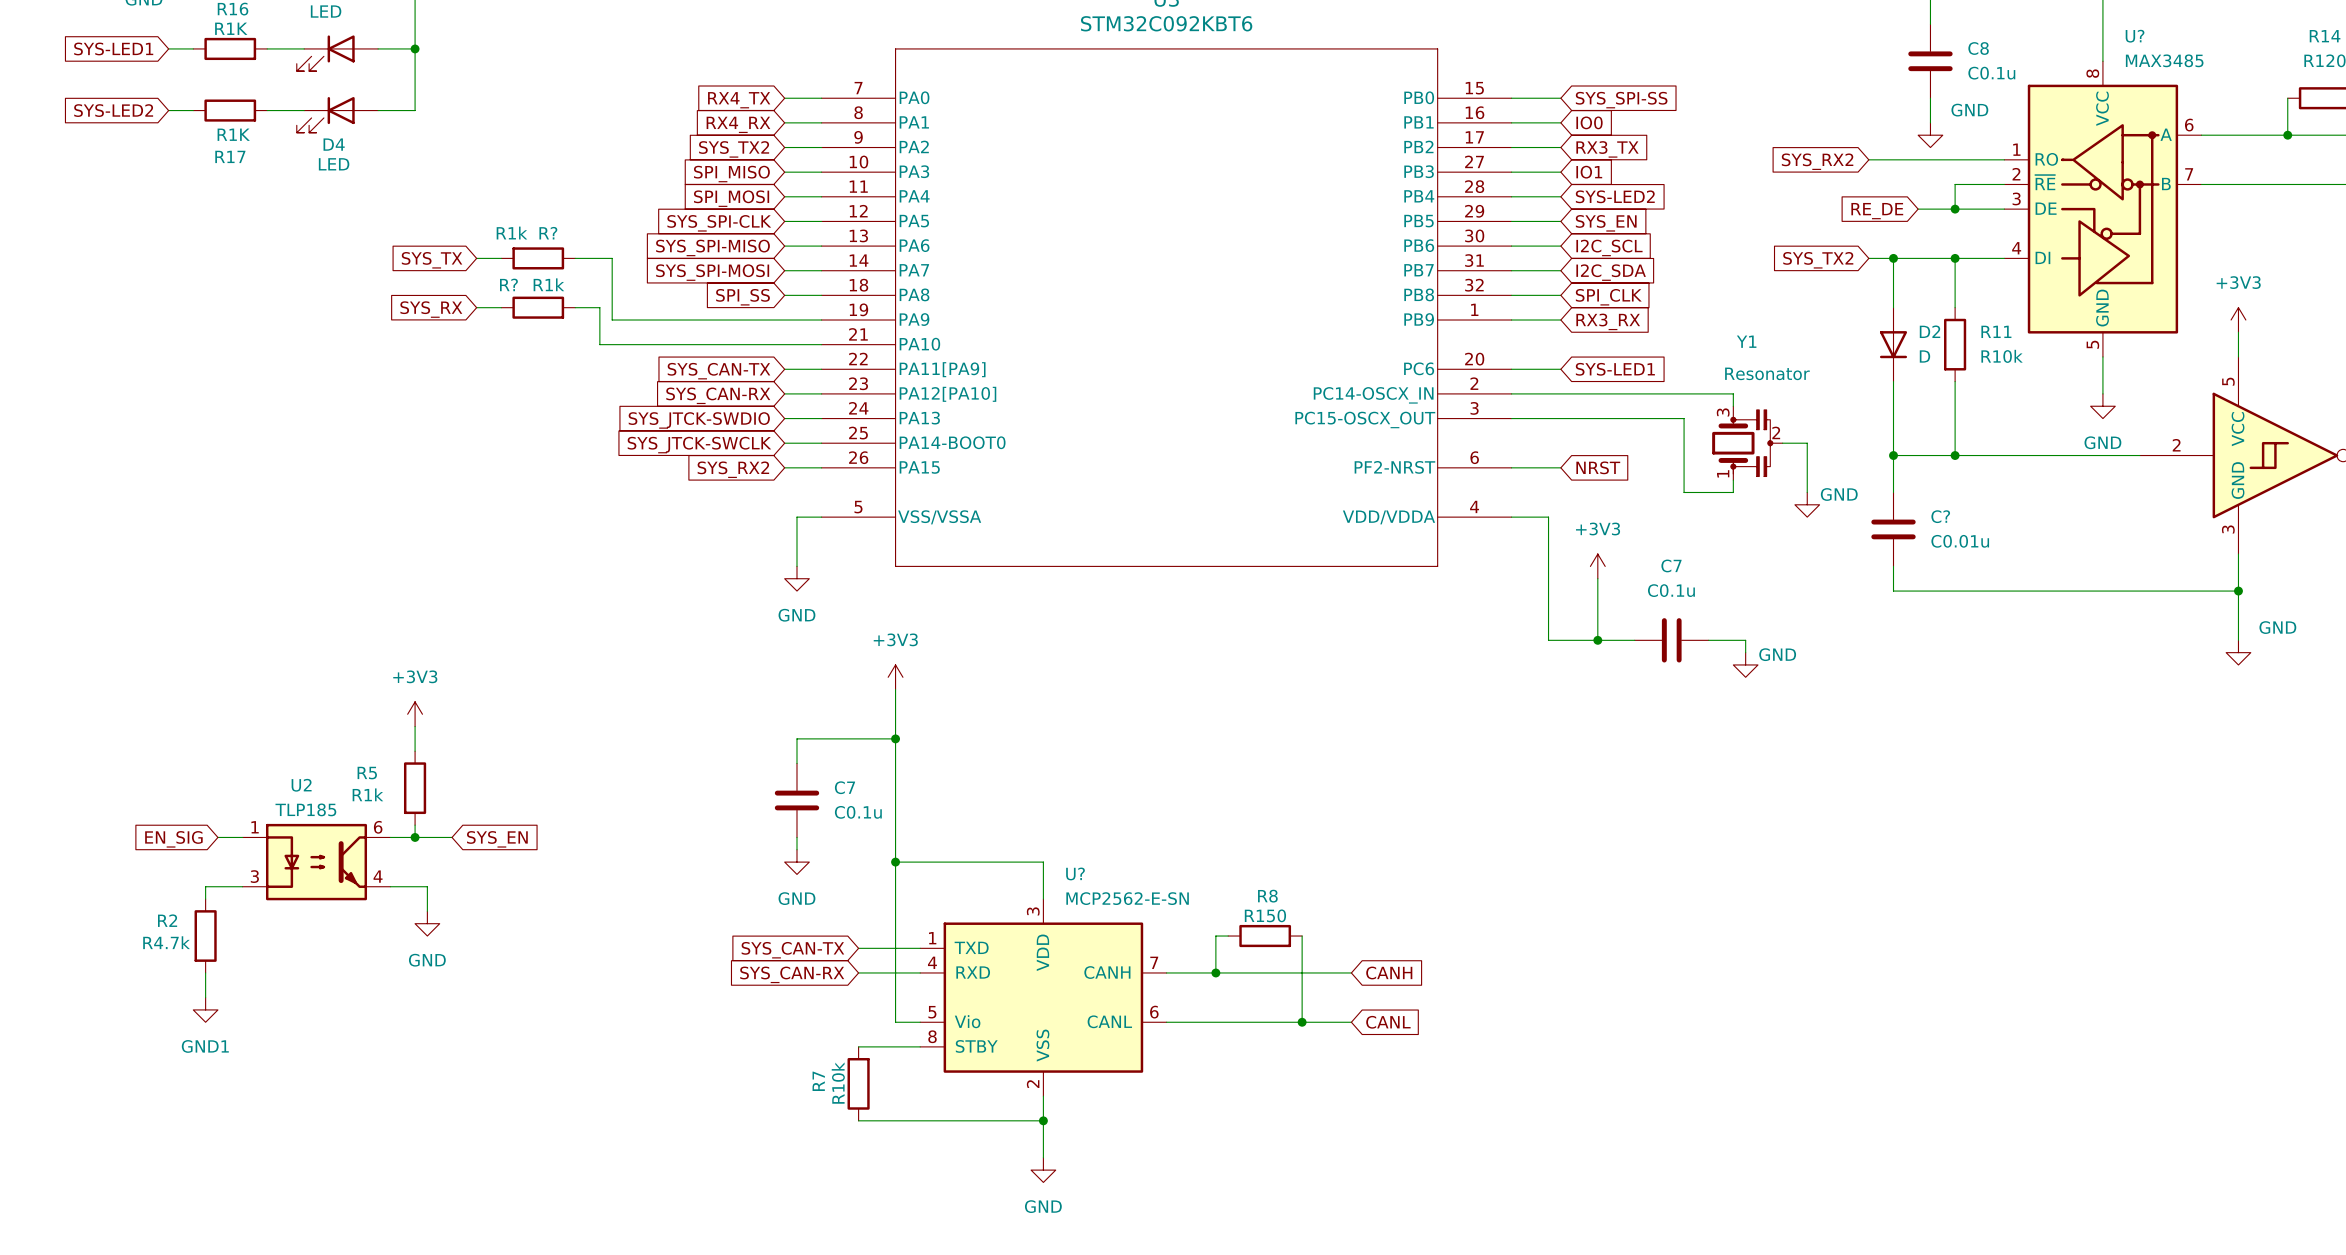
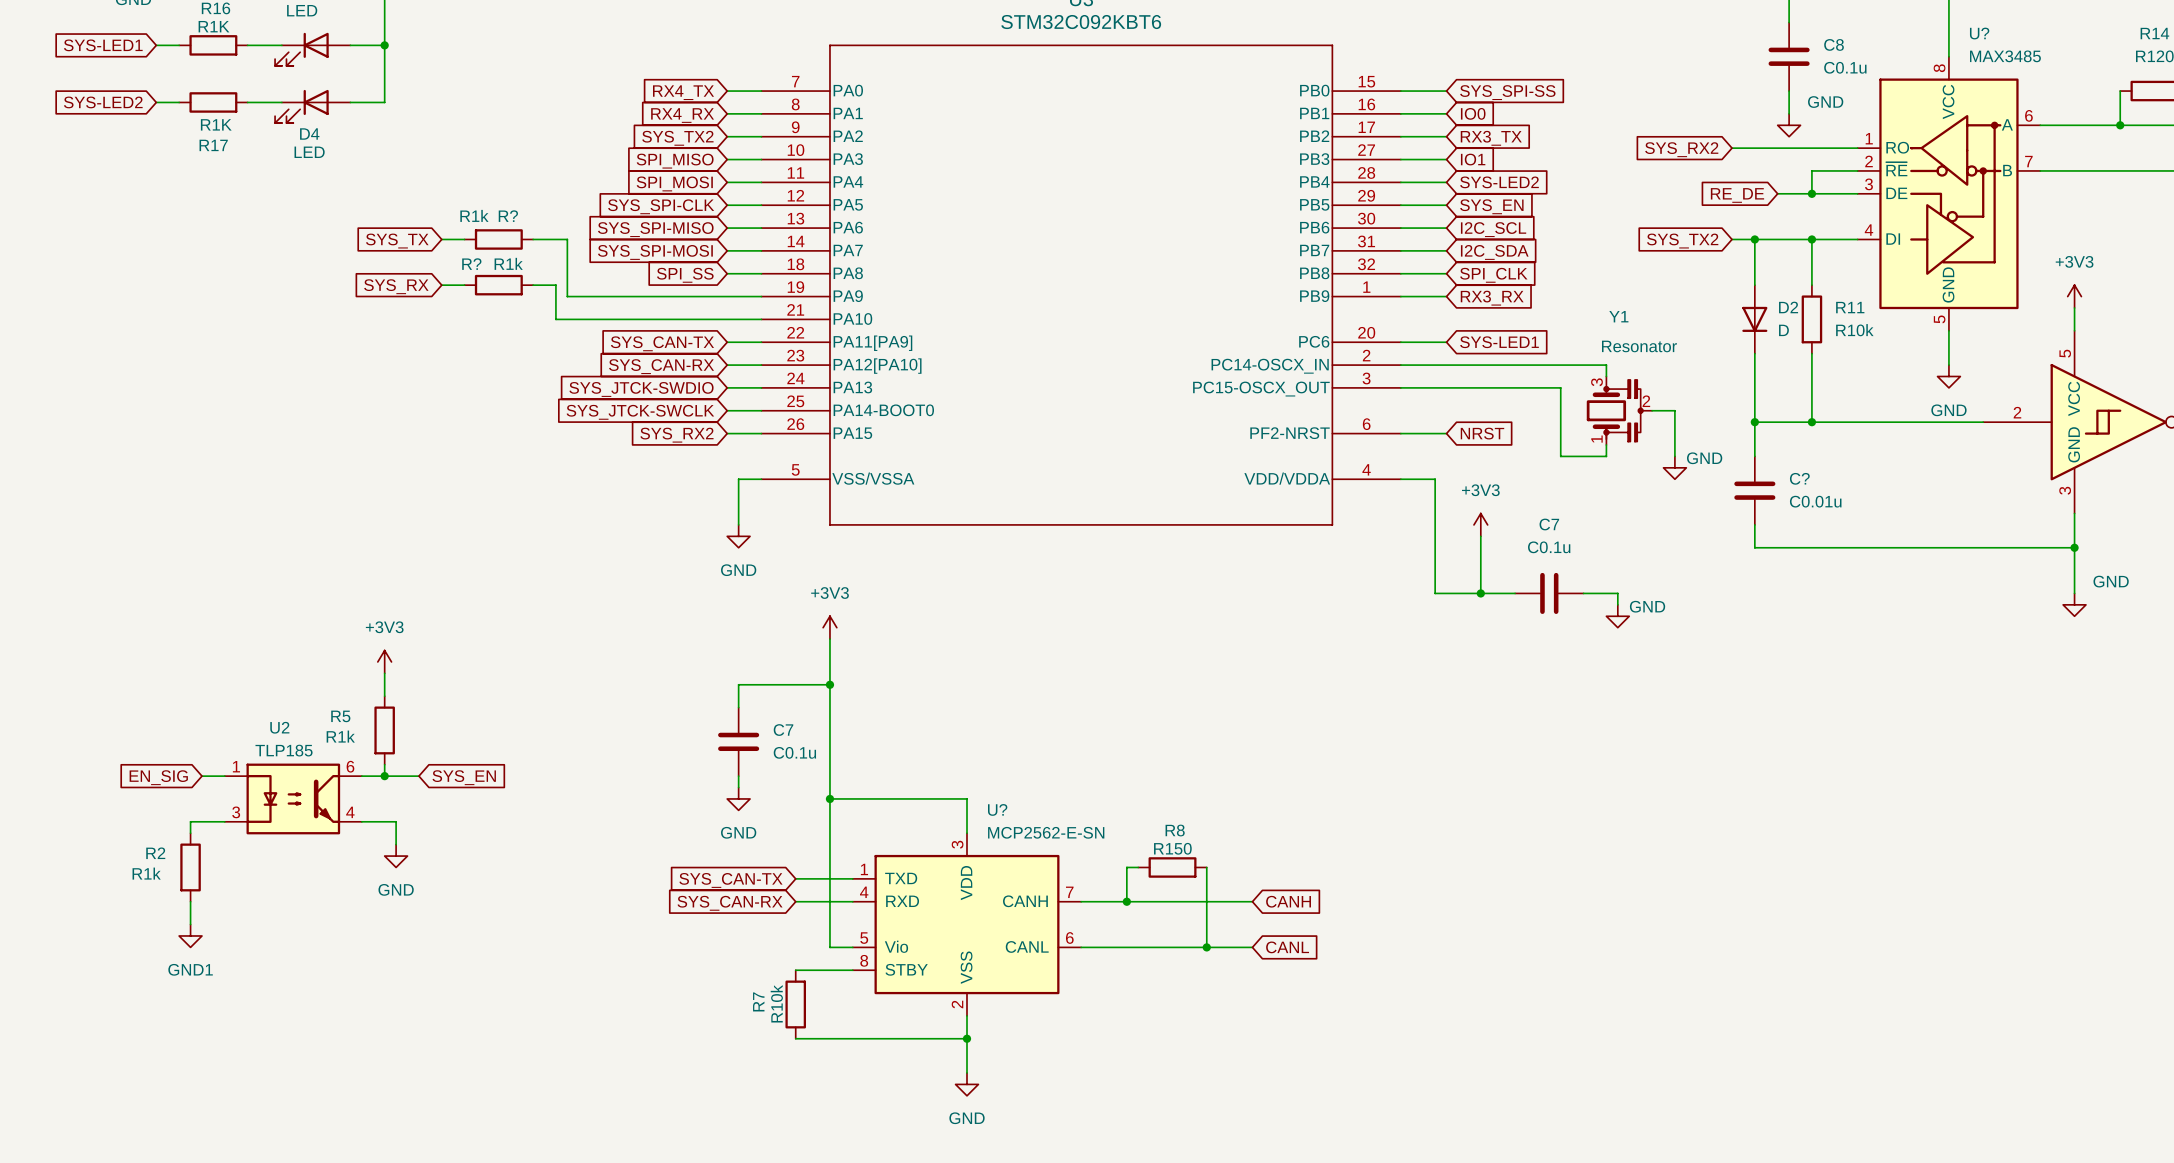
R2 value: R4.7k (166, 942) -> R1k (146, 873)

